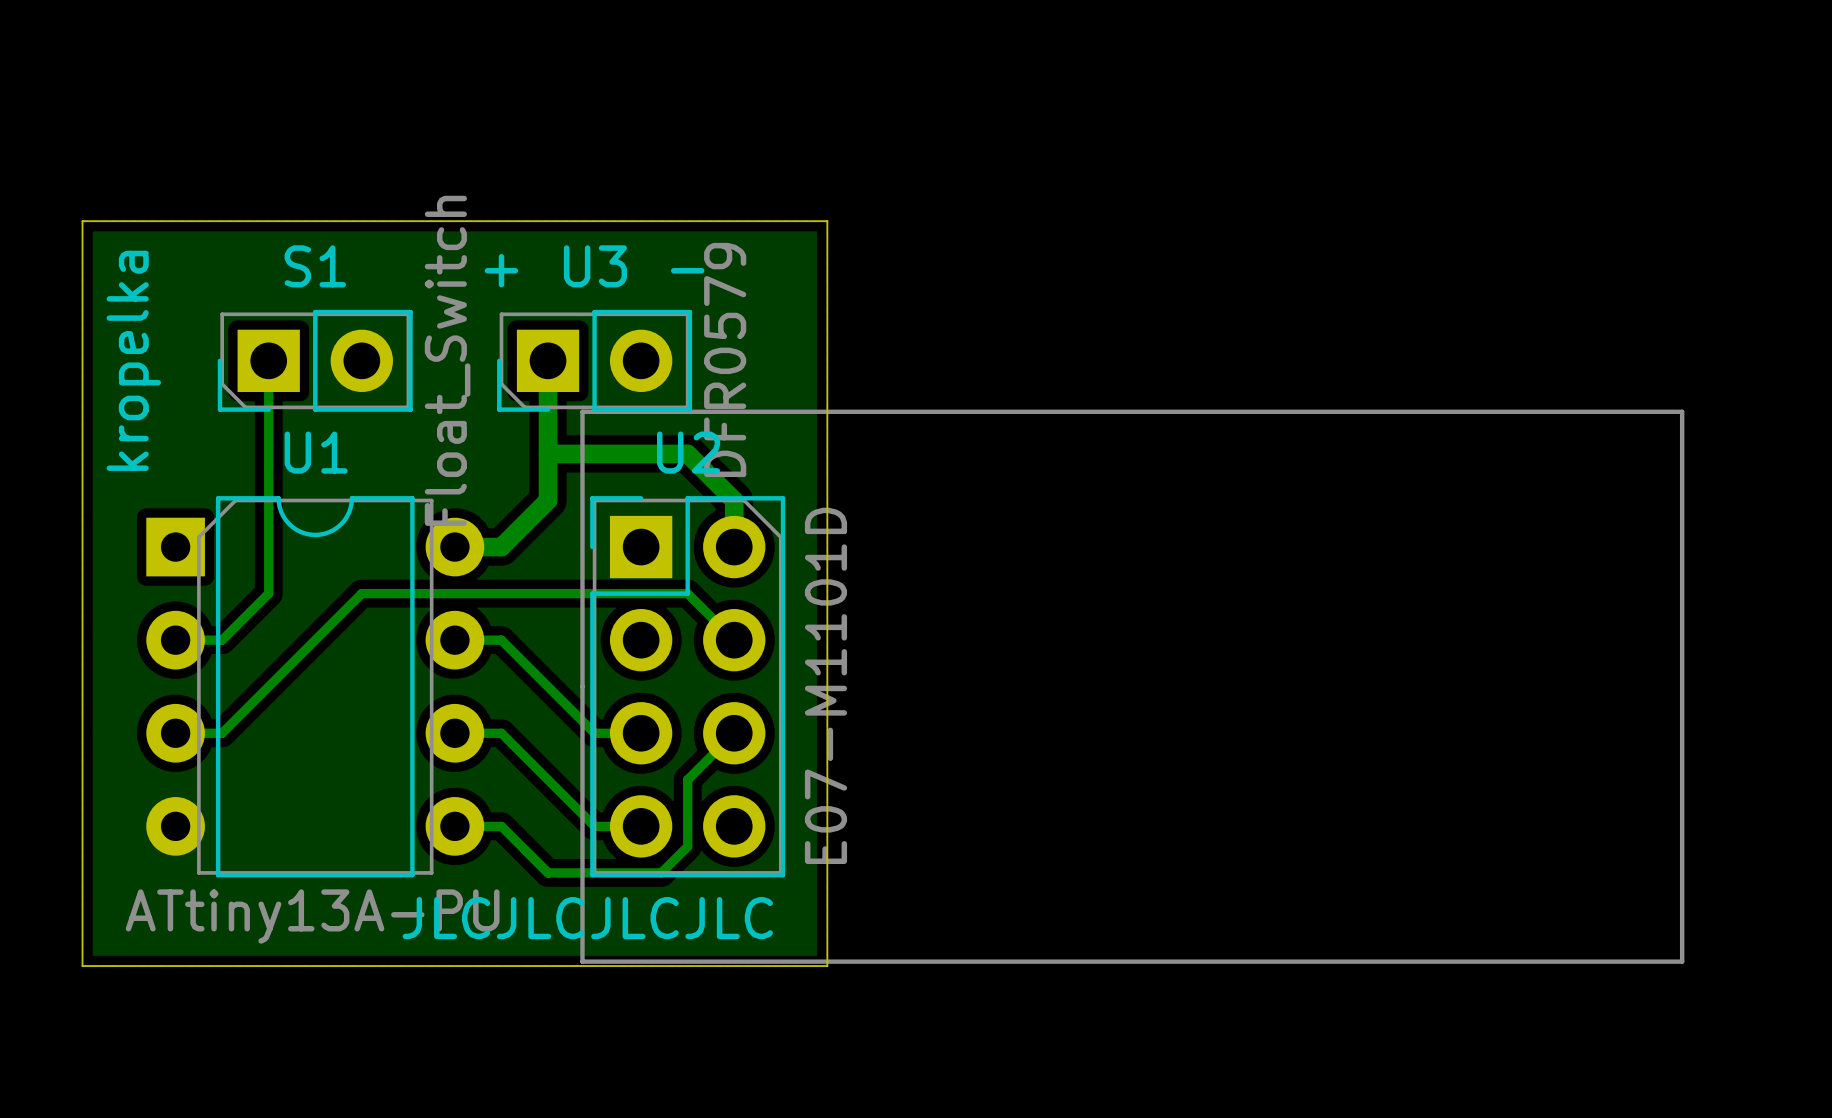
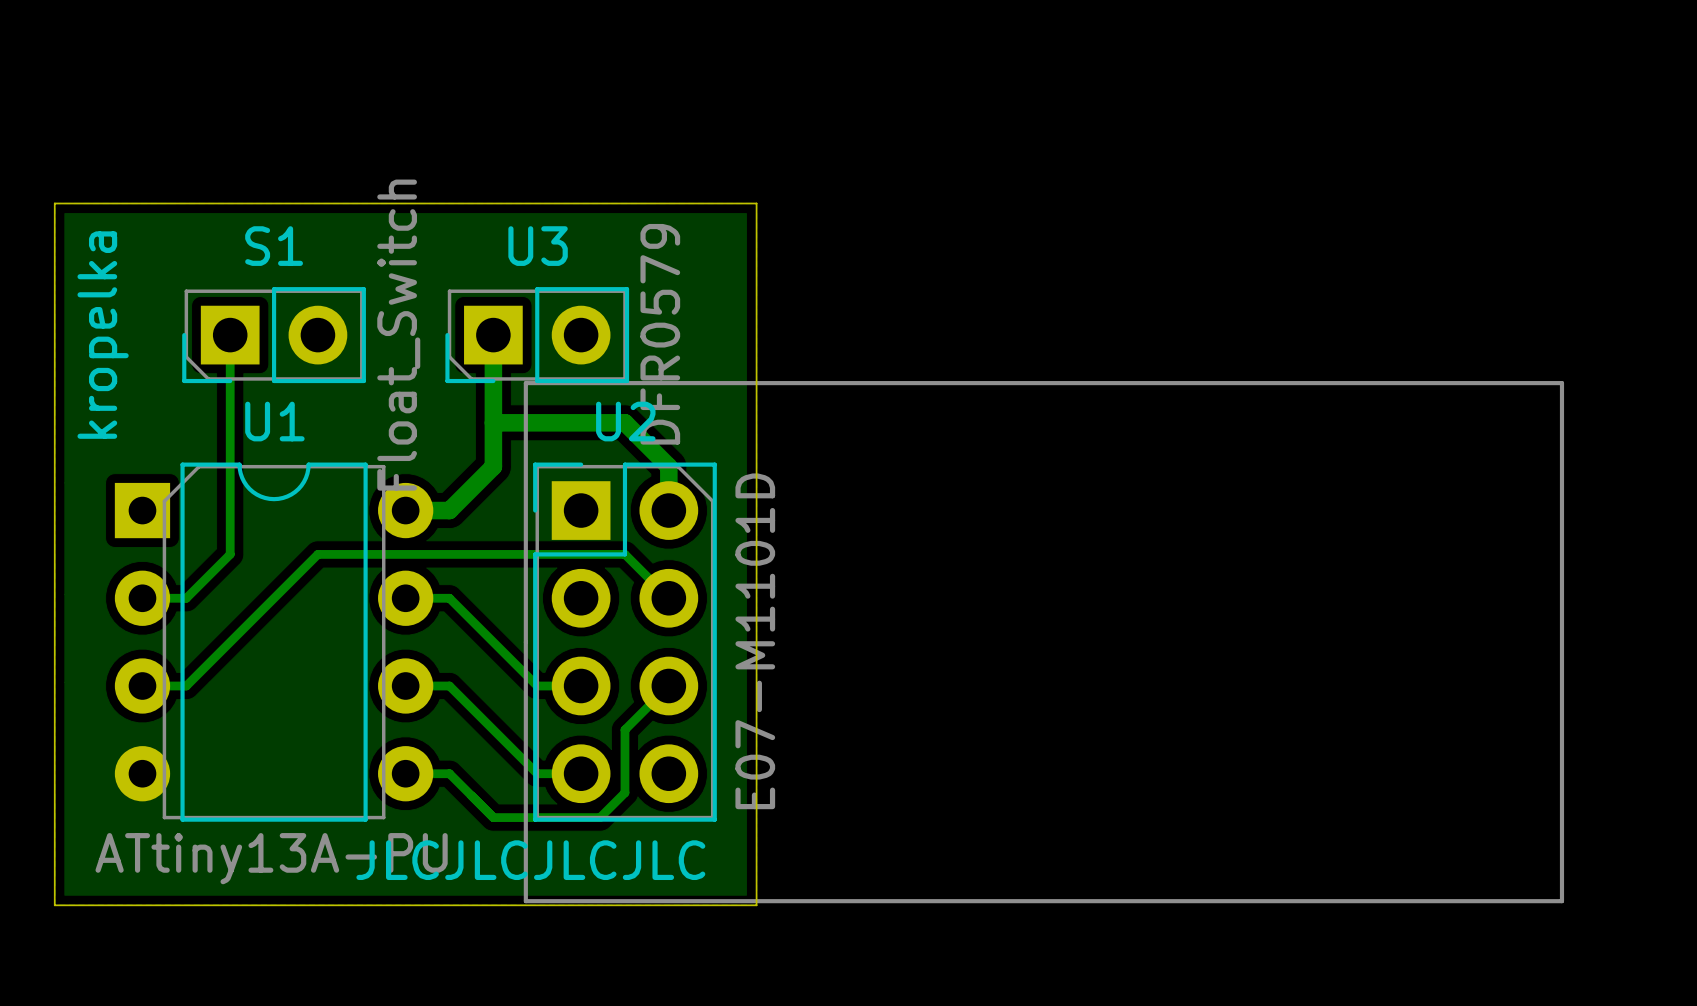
text: + (501, 270) -> none
text: - (687, 270) -> none

